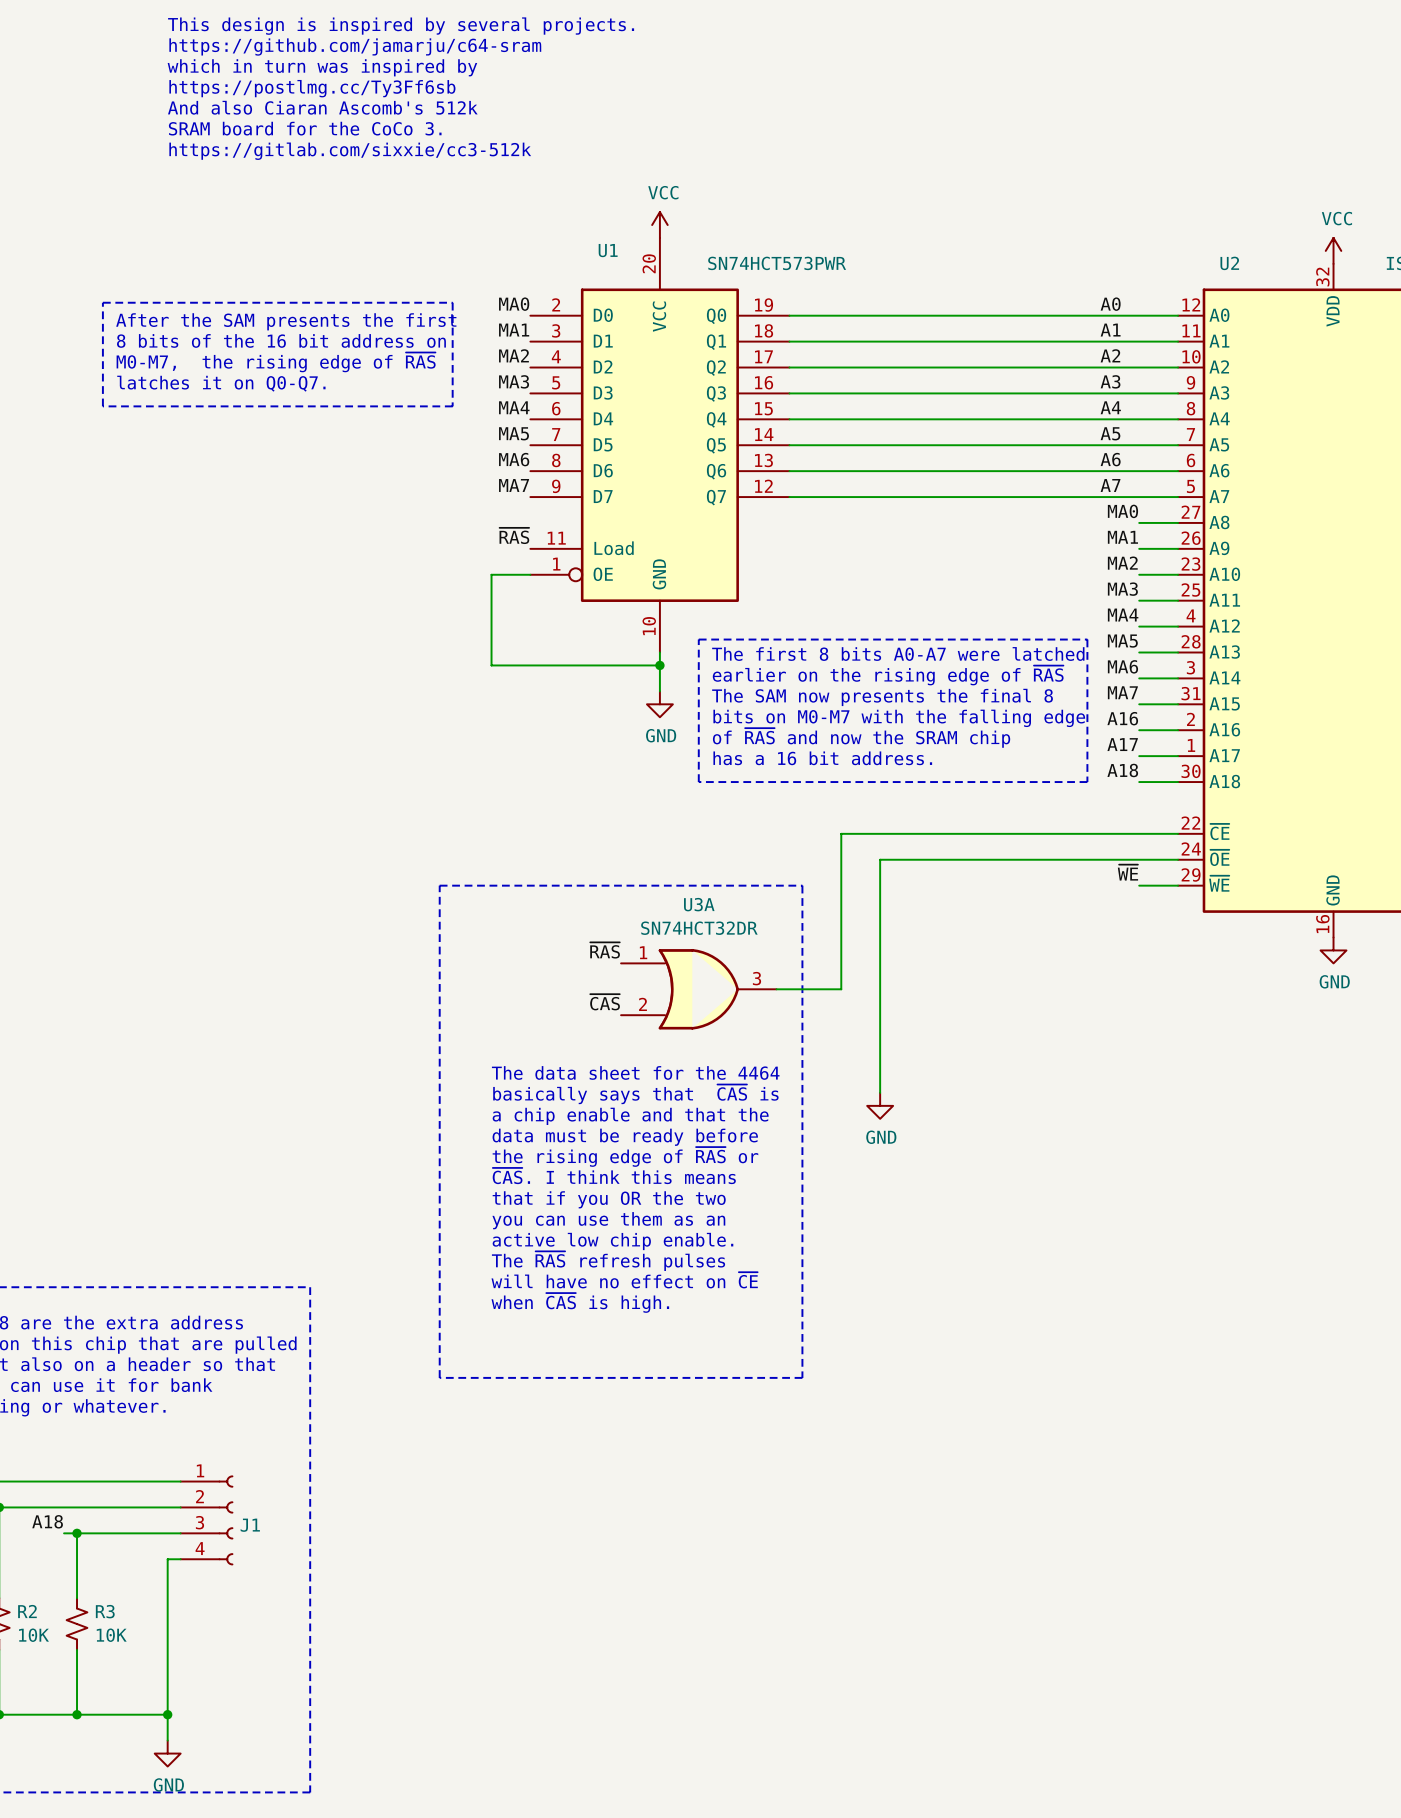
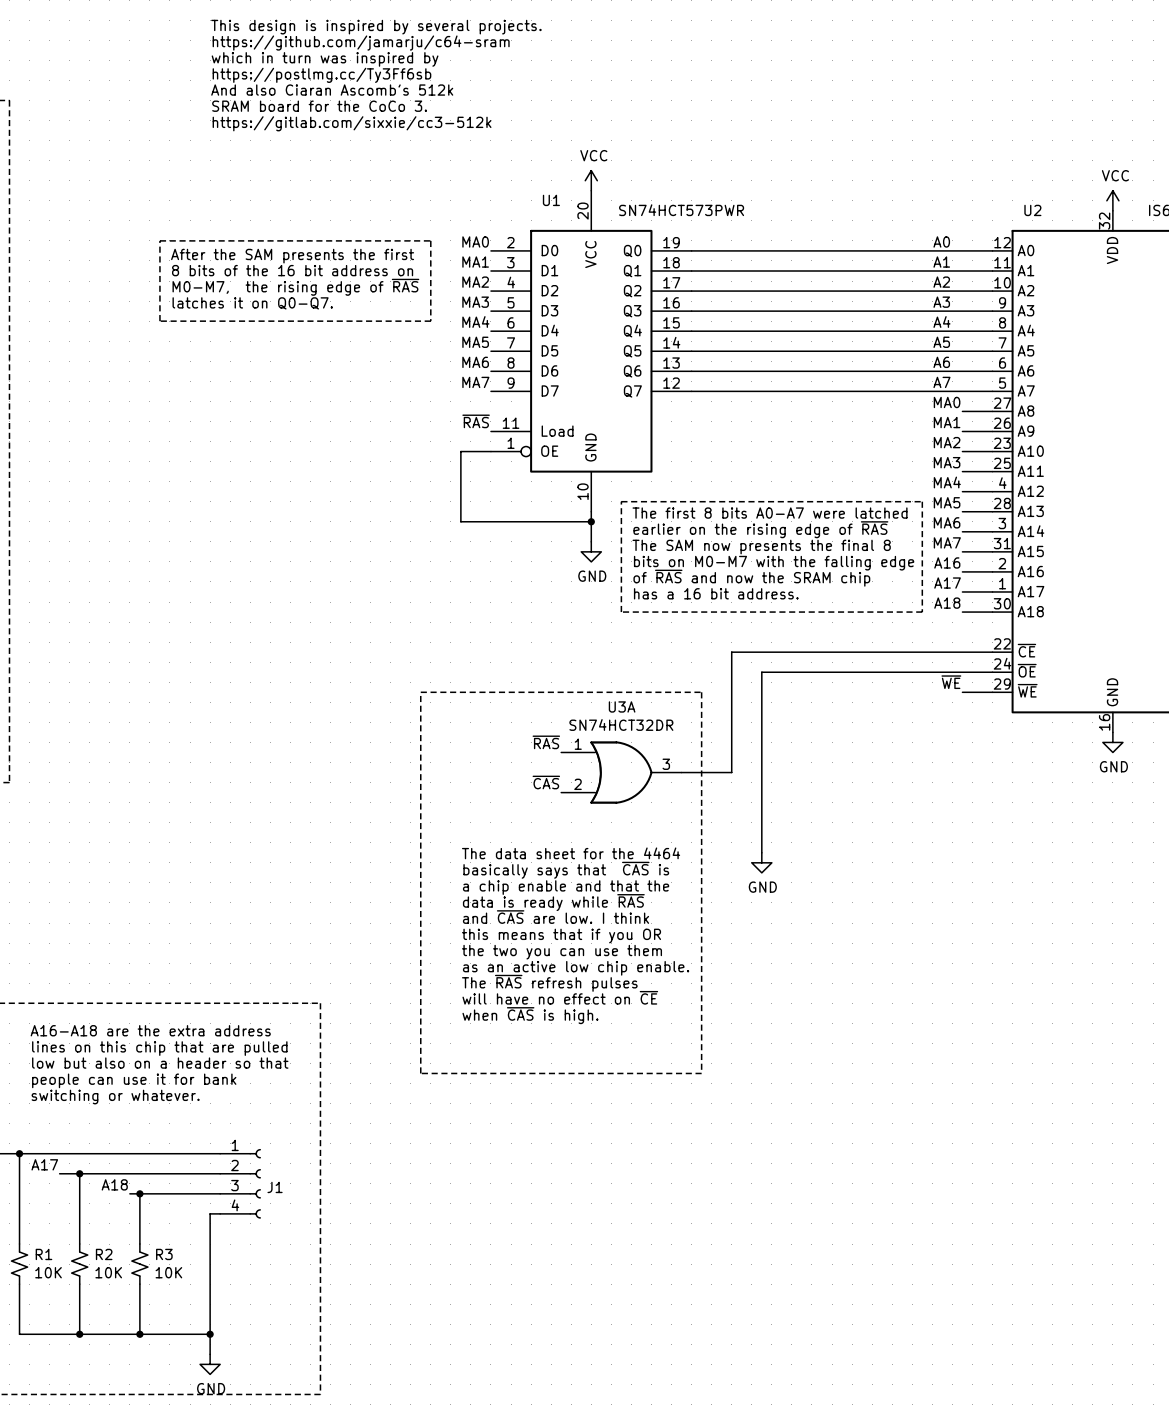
text: The data sheet for the 4464 (635, 1072) -> none
text: basically says that ~{CAS} is (635, 1094) -> The data sheet for the 4464 (571, 853)
text: a chip enable and that the (630, 1116) -> basically says that ~{CAS} is (566, 870)
text: data must be ready before (625, 1137) -> a chip enable and that the (566, 887)
text: the rising edge of ~{RAS} or (625, 1156) -> data is ready while ~{RAS} (553, 902)
text: ~{CAS}. I think this means (614, 1176) -> and ~{CAS} are low. I think (556, 917)
text: that if you OR the two (609, 1199) -> this means that if you OR (561, 936)
text: you can use them as an (608, 1220) -> the two you can use them (561, 952)
text: active low chip enable. (612, 1241) -> as an active low chip enable. (576, 968)

